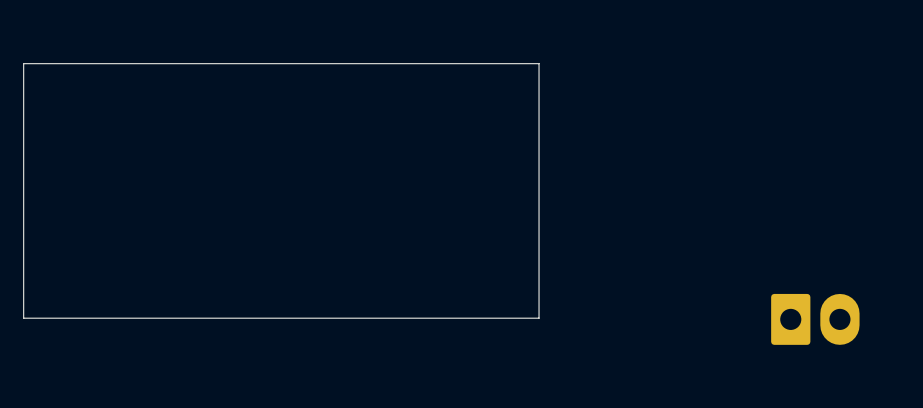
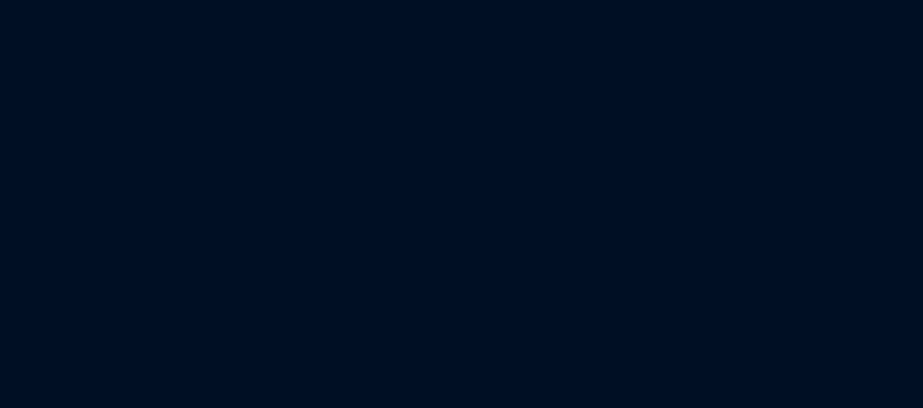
board edge: (539, 63) (23, 63) (23, 318) (539, 318) (539, 63) -> none
part: (815, 319) -> none

